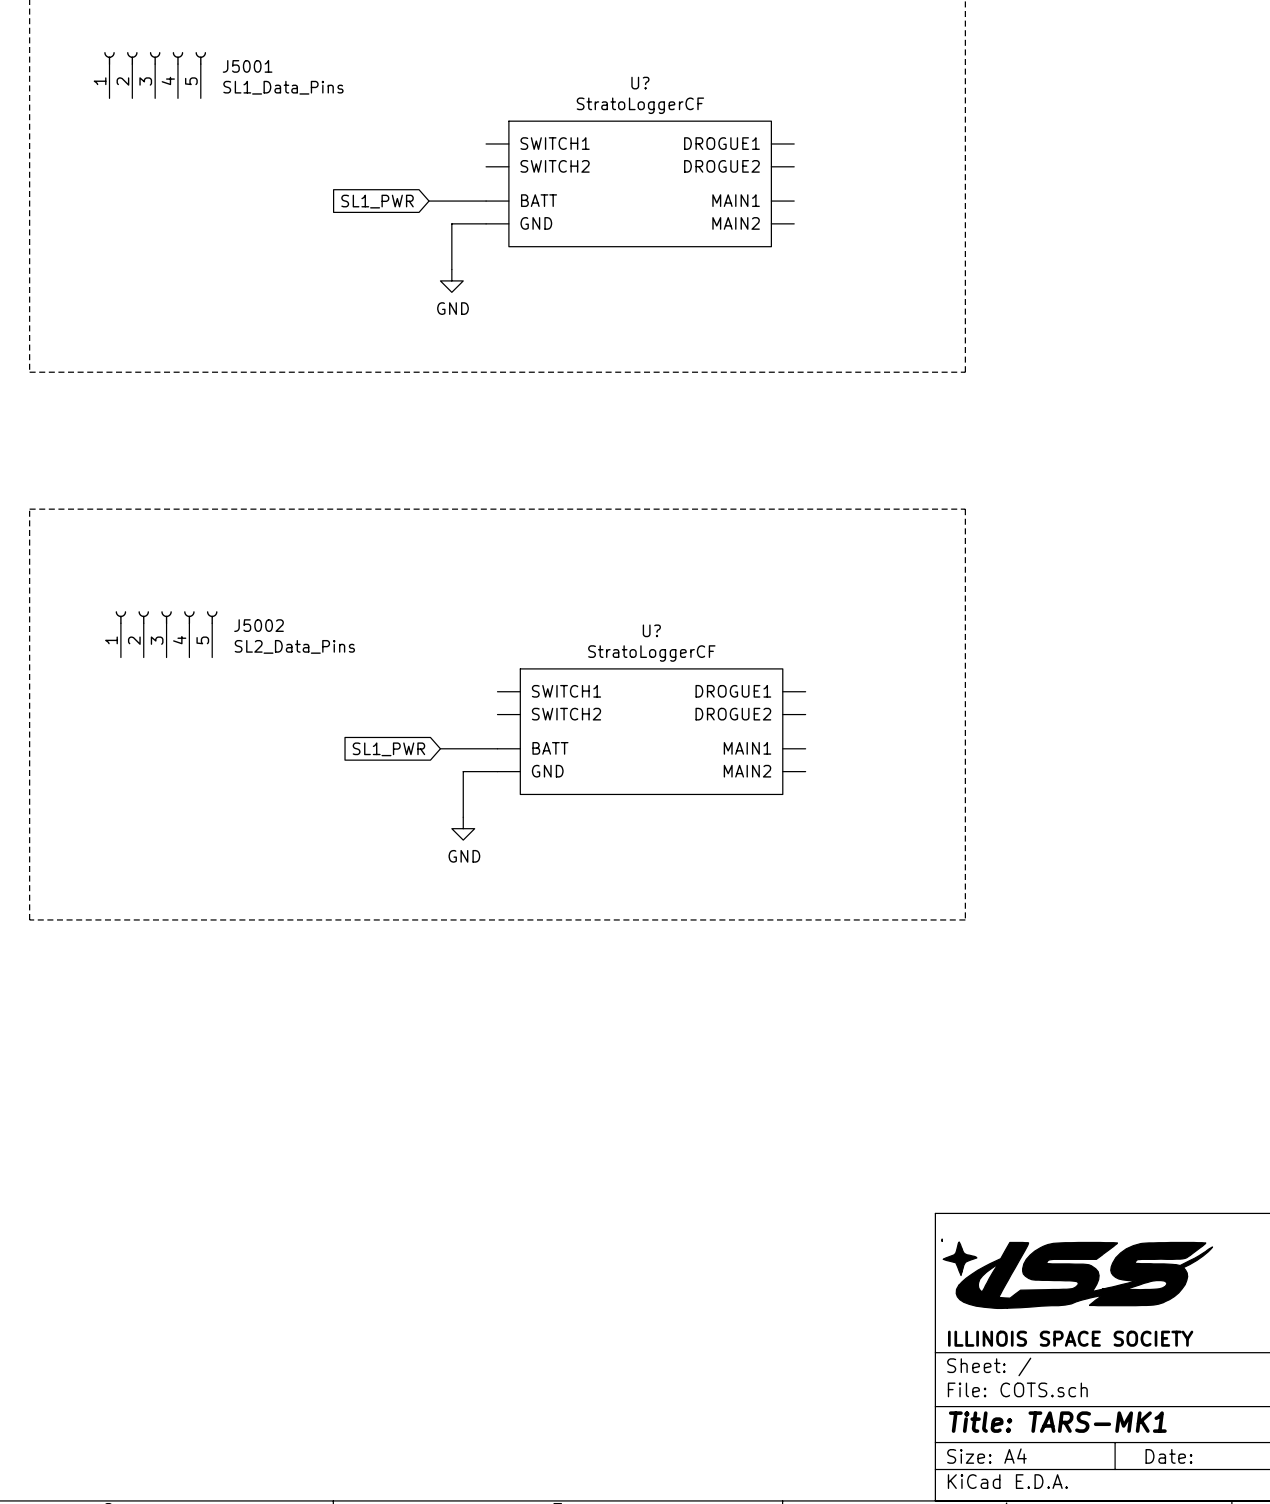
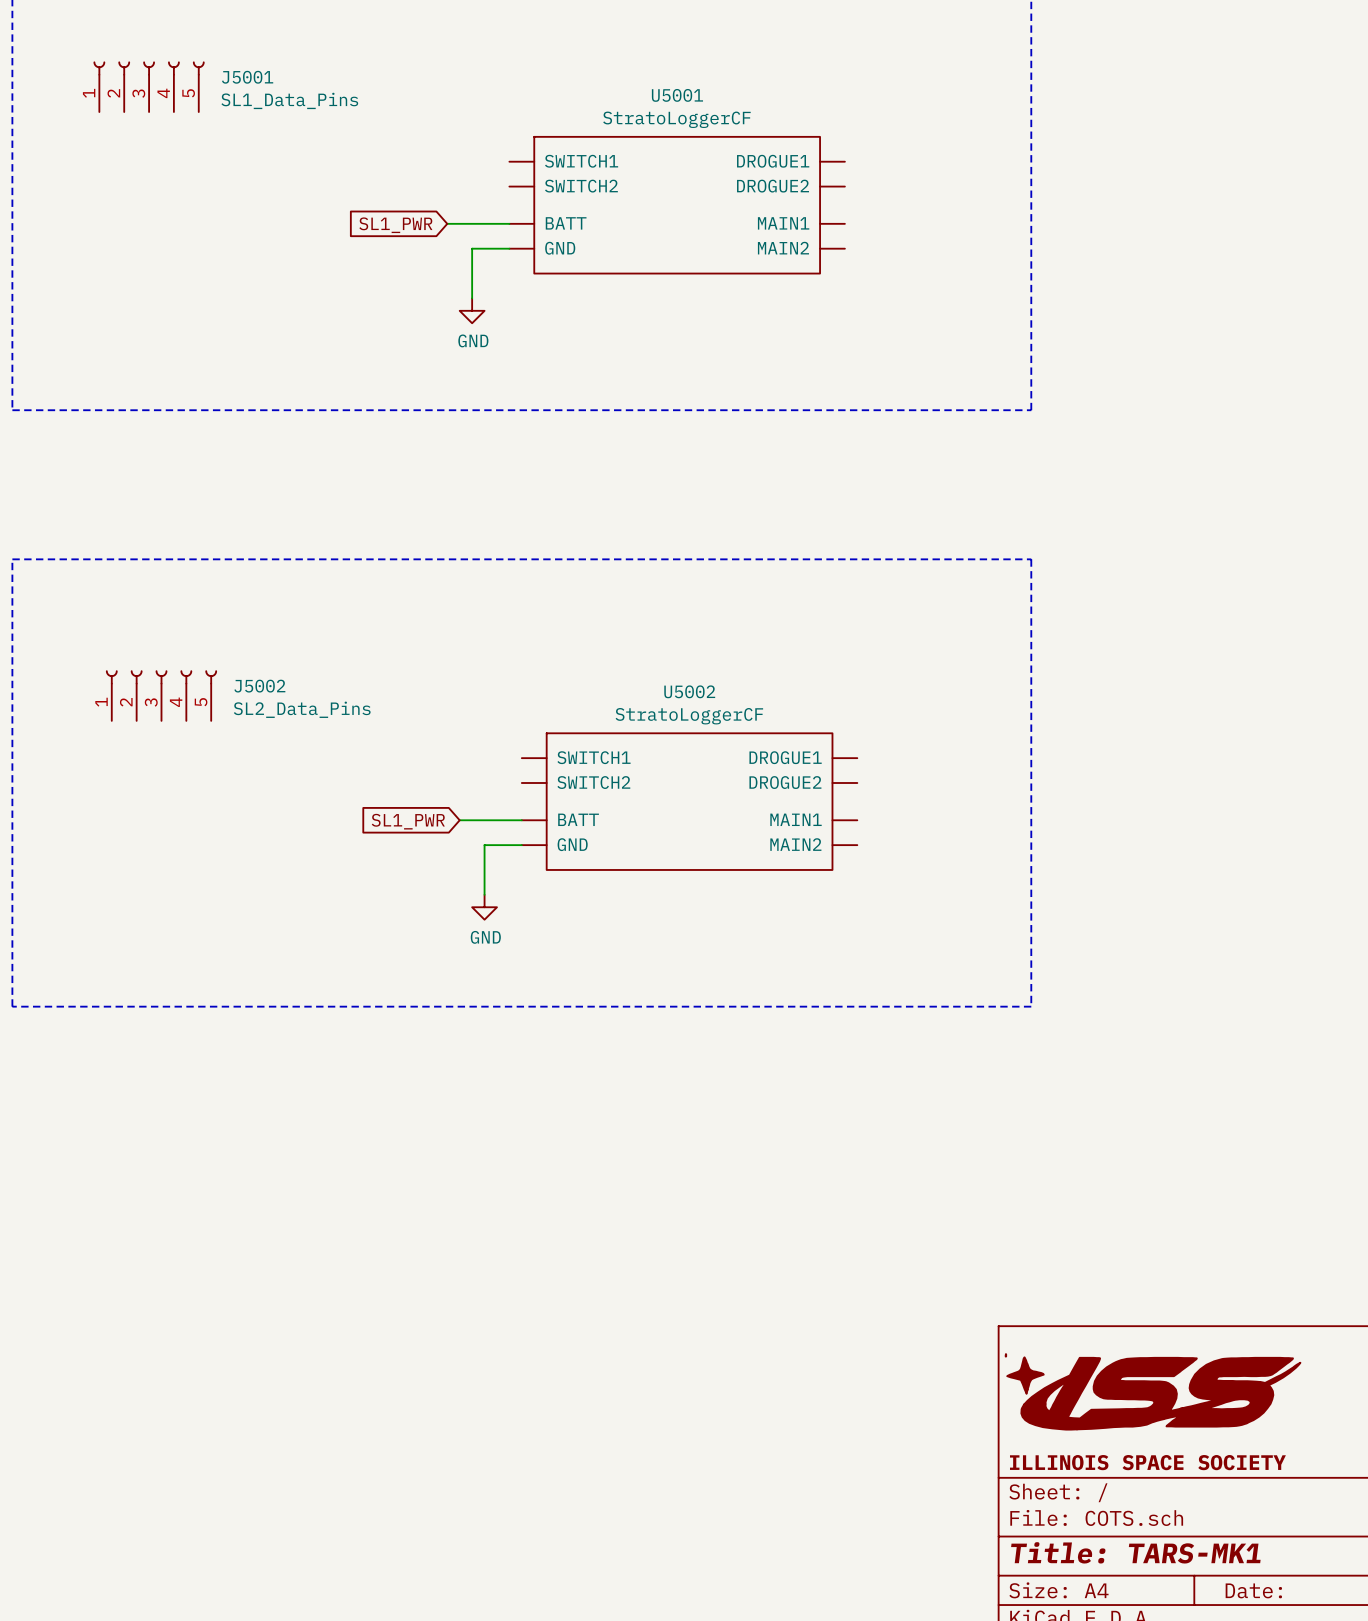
U? name: U? (640, 83) -> U5001 (677, 95)
U? name: U? (651, 630) -> U5002 (689, 691)

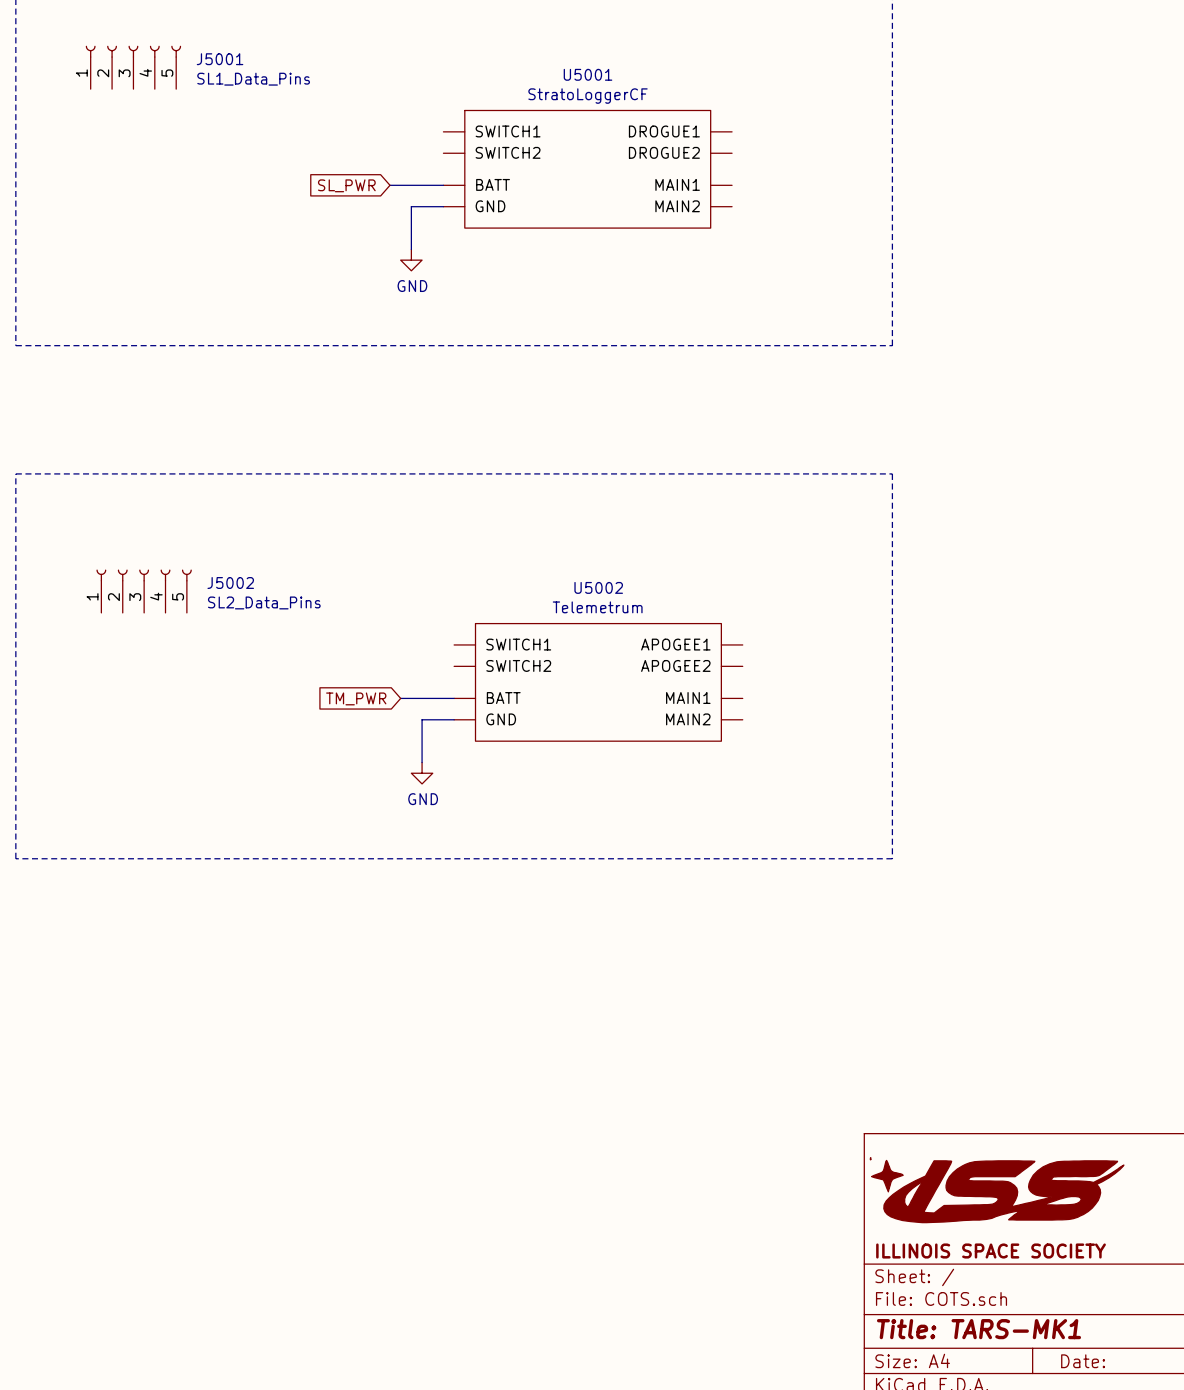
global label: SL1_PWR (395, 225) -> SL_PWR (346, 185)
U5002 value: StratoLoggerCF (689, 716) -> Telemetrum (597, 607)
U5002 pin name: DROGUE1 (785, 757) -> APOGEE1 (675, 644)
U5002 pin name: DROGUE2 (785, 782) -> APOGEE2 (675, 665)
global label: SL1_PWR (408, 821) -> TM_PWR (356, 698)

